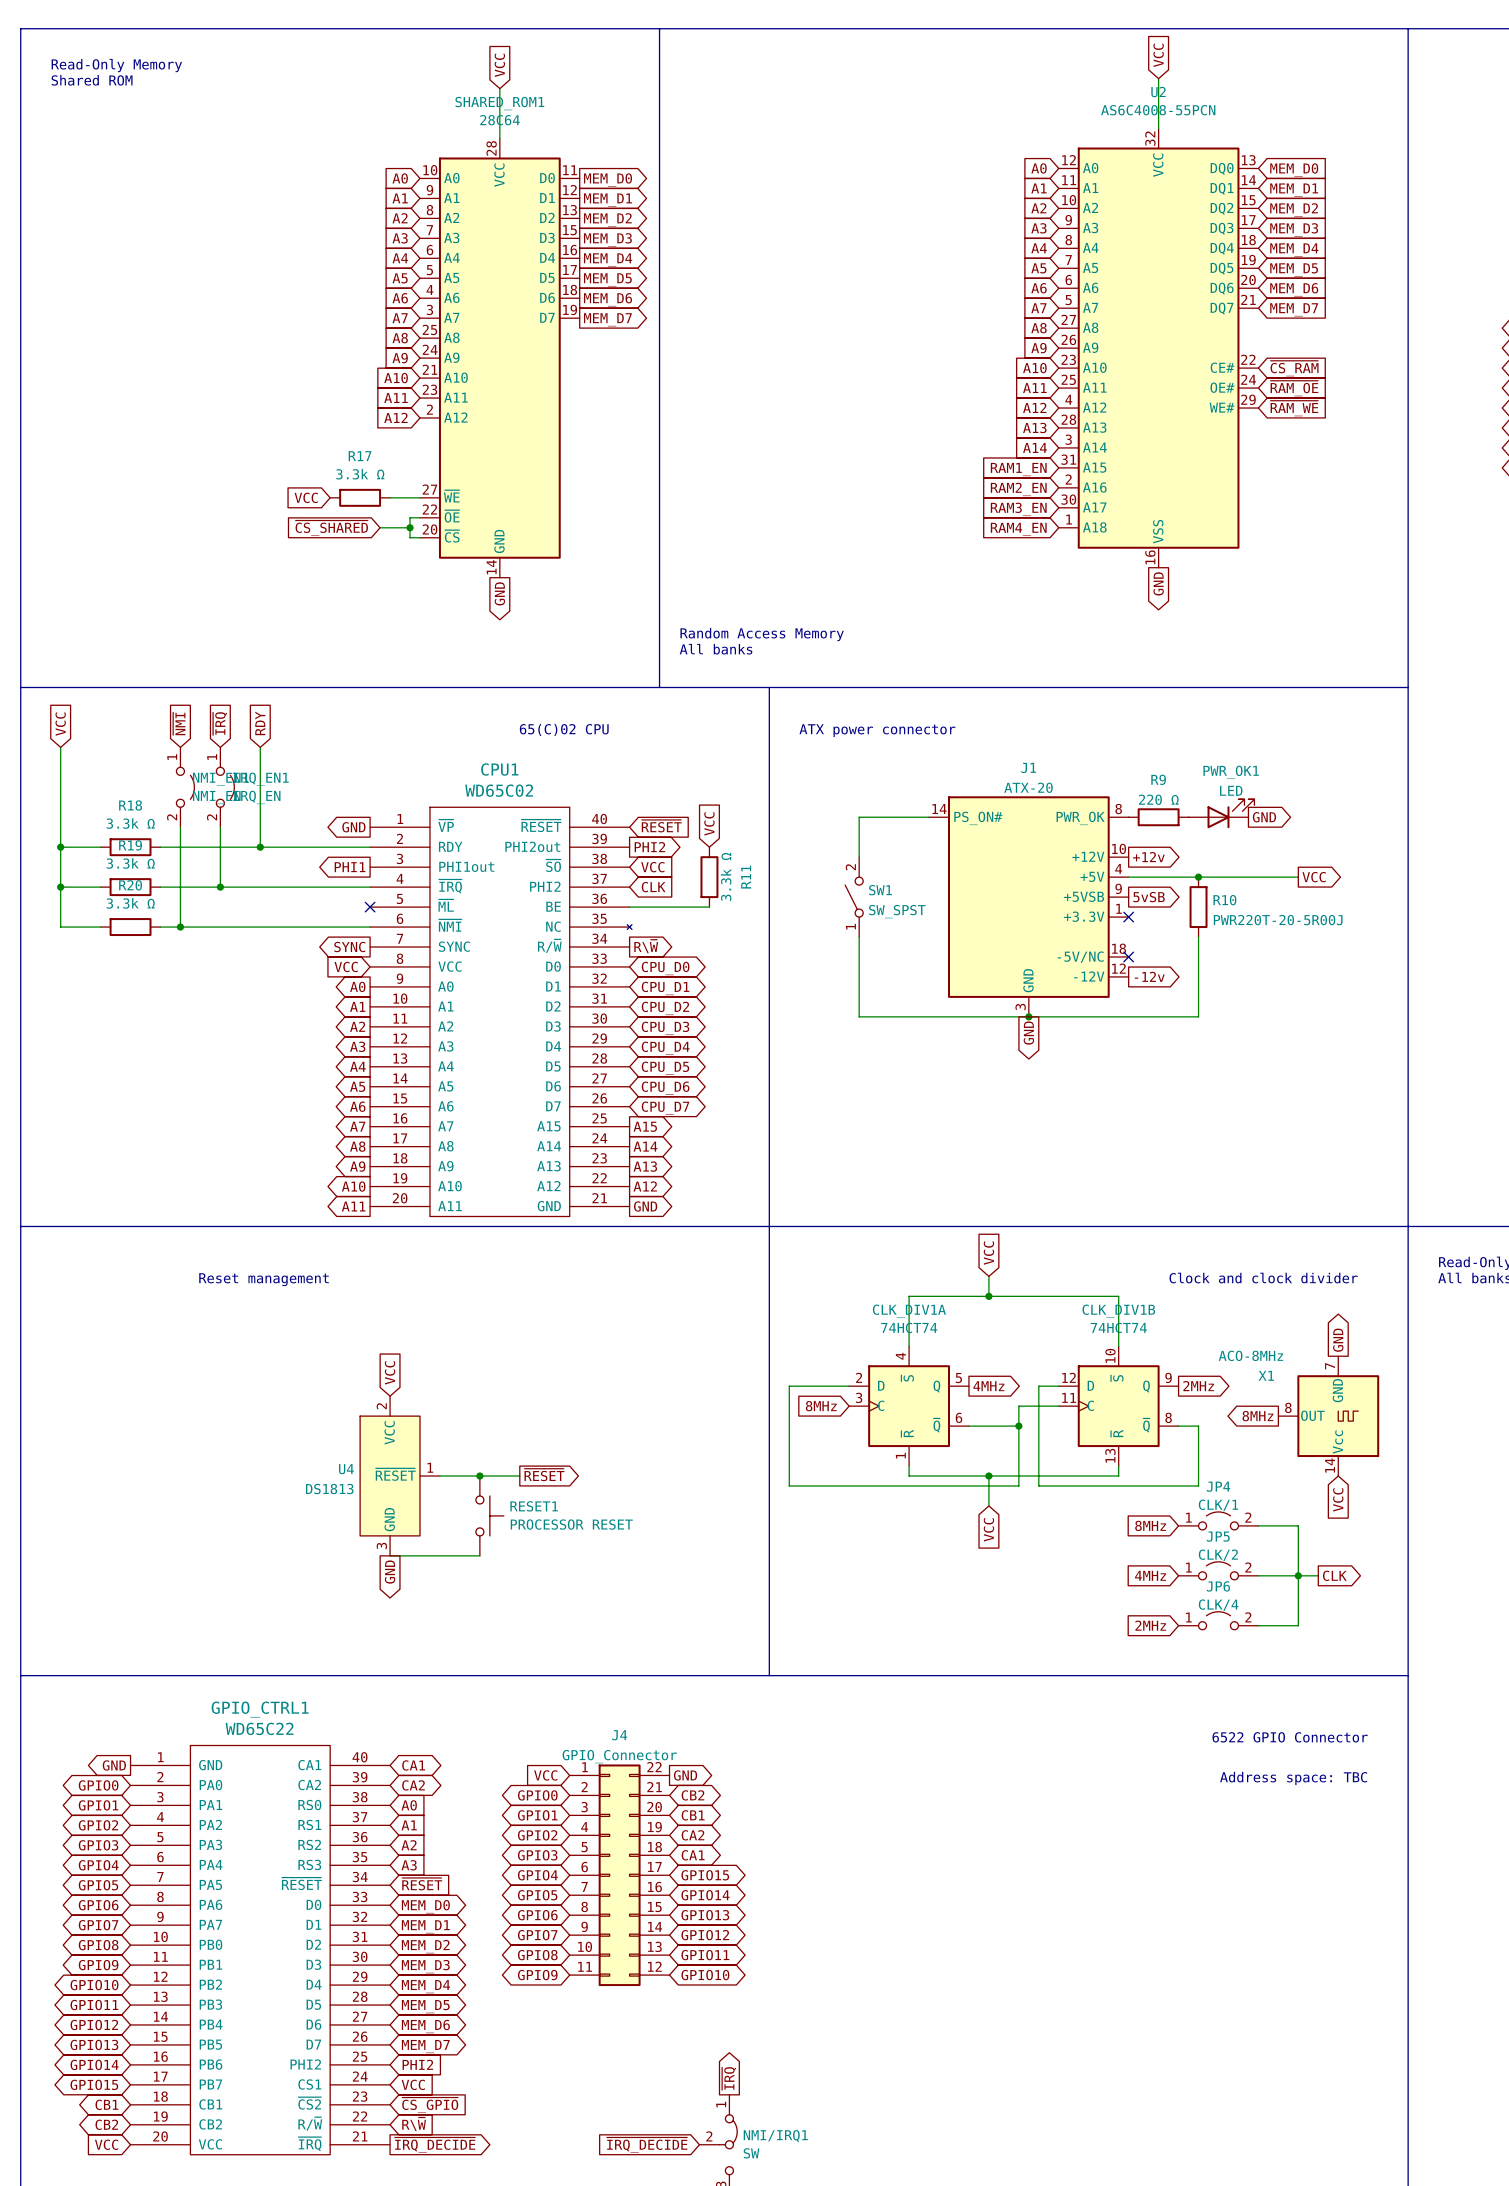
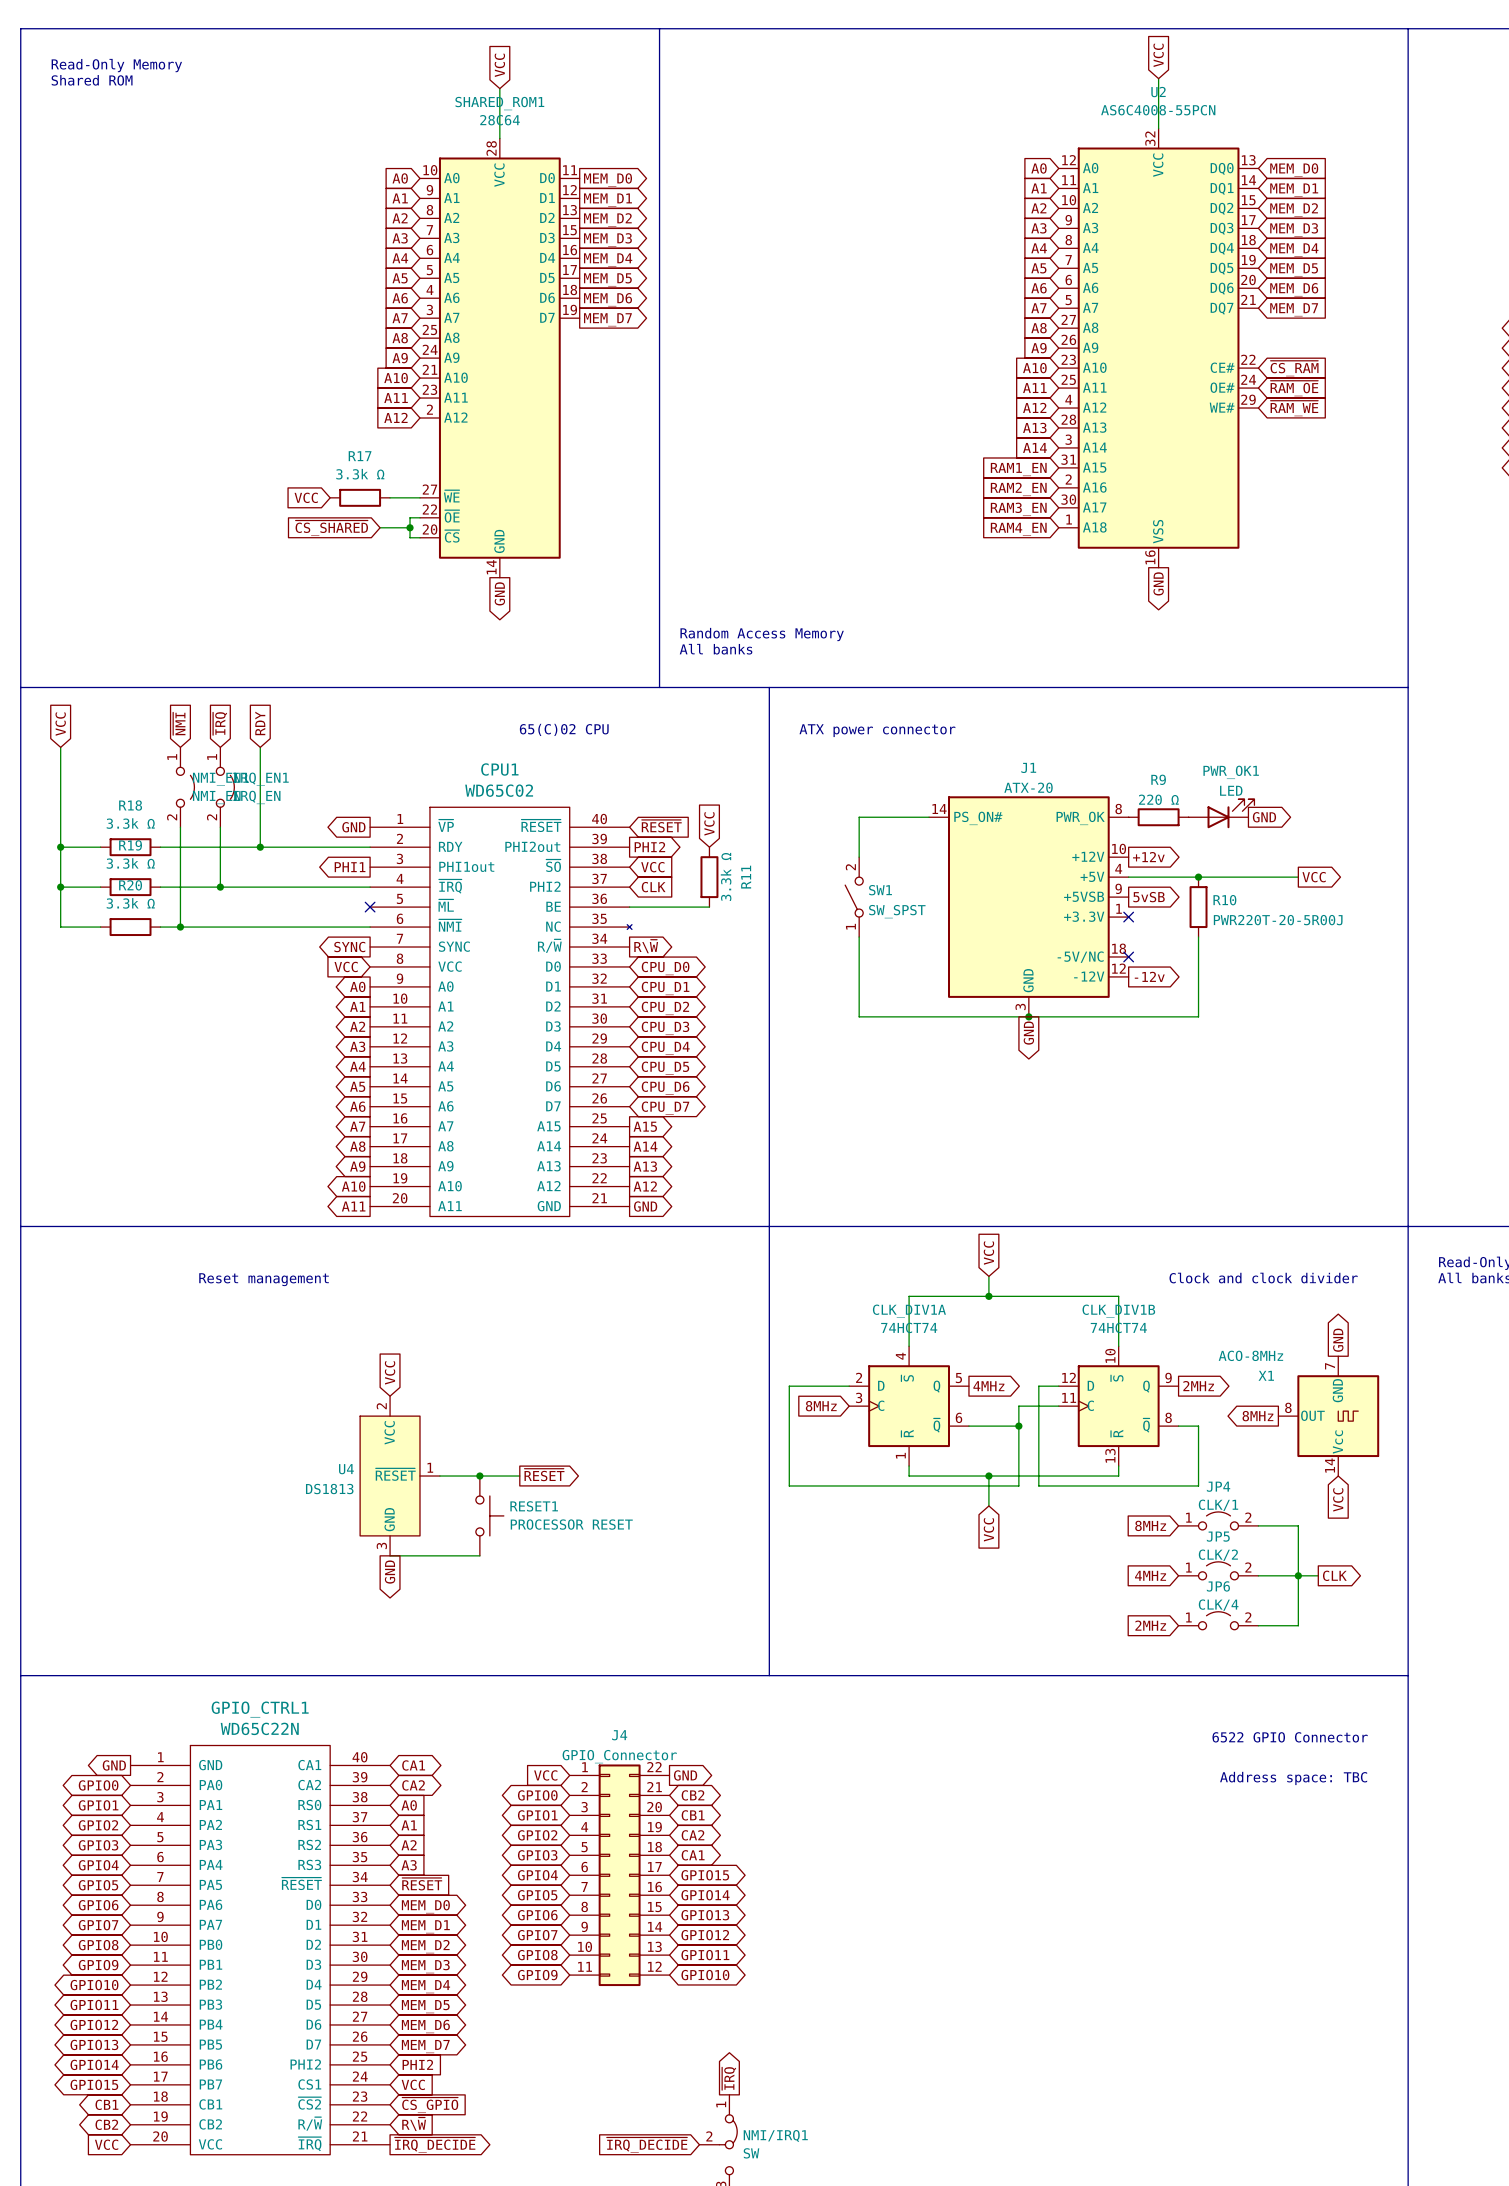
GPIO_CTRL1 value: WD65C22 (259, 1728) -> WD65C22N (259, 1728)

